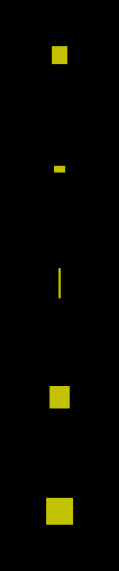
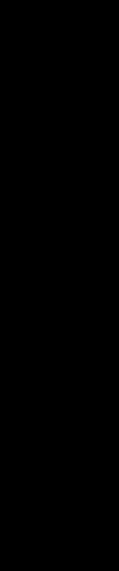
part: (59, 55) -> none
part: (59, 169) -> none
part: (59, 283) -> none
part: (59, 397) -> none
part: (59, 511) -> none

